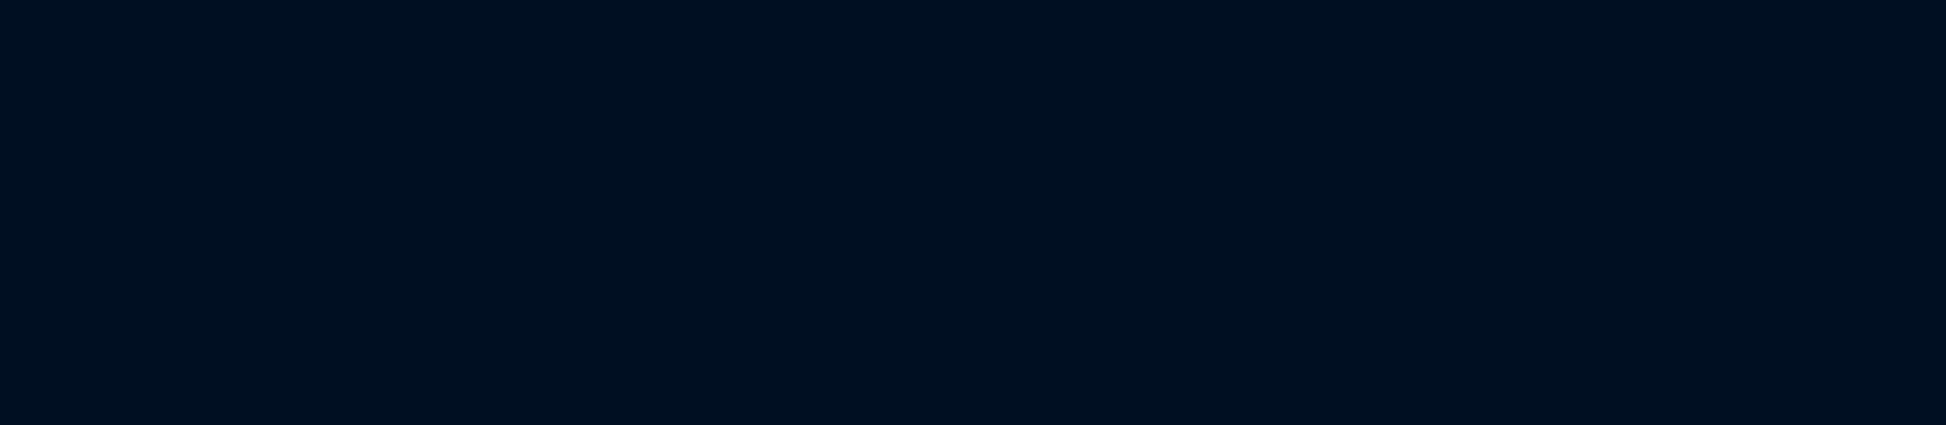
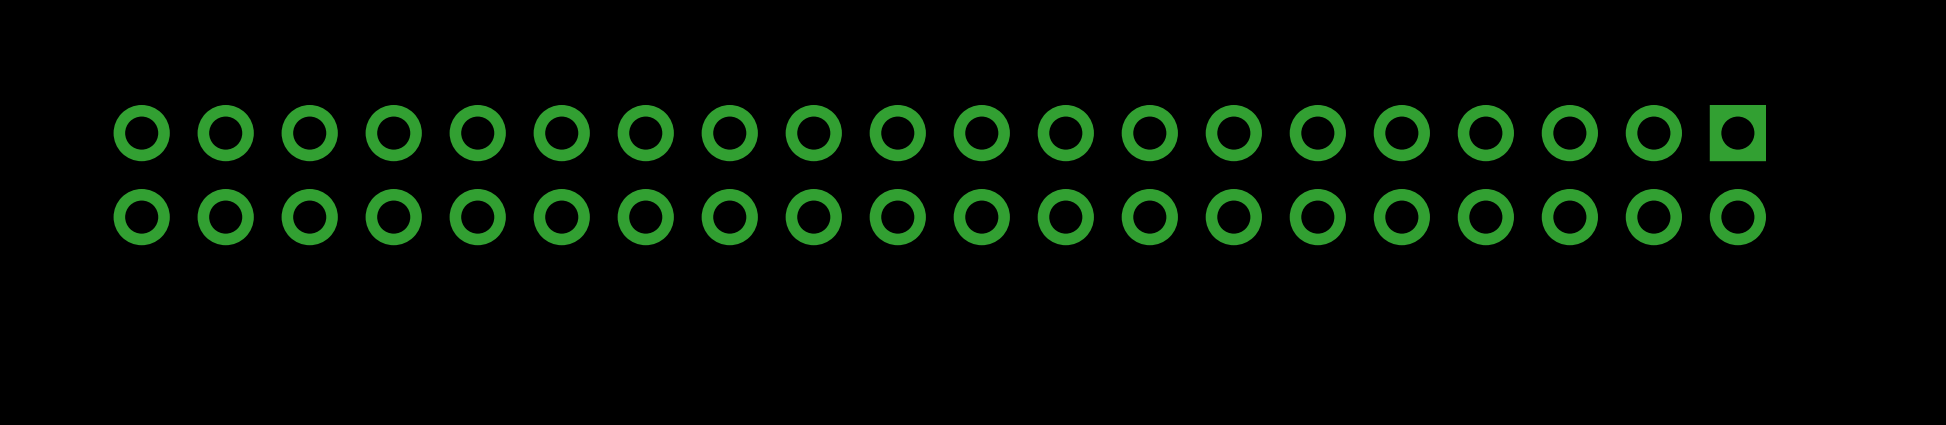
part: none -> (939, 175)

